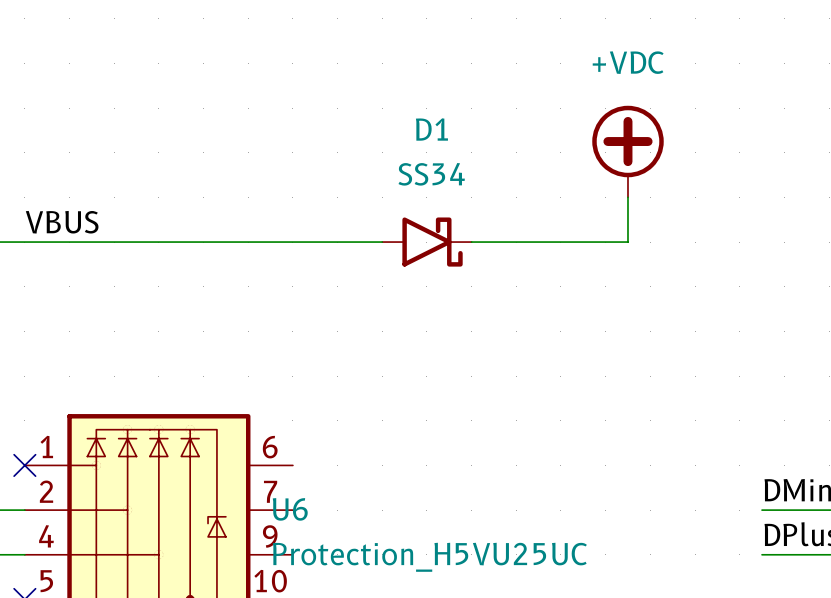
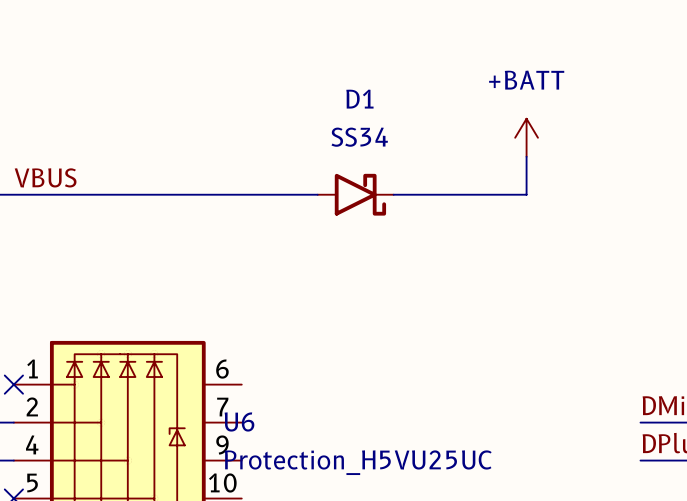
power symbol: +VDC (627, 151) -> none
power symbol: none -> +BATT (526, 137)

